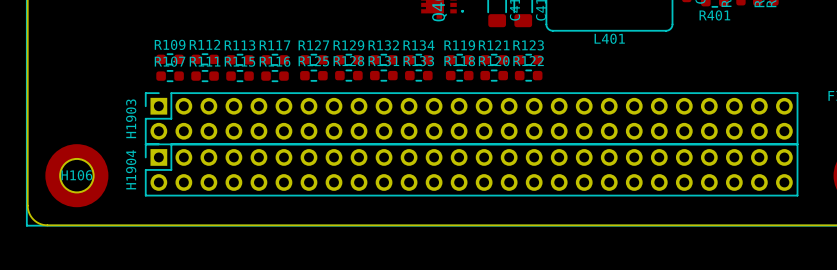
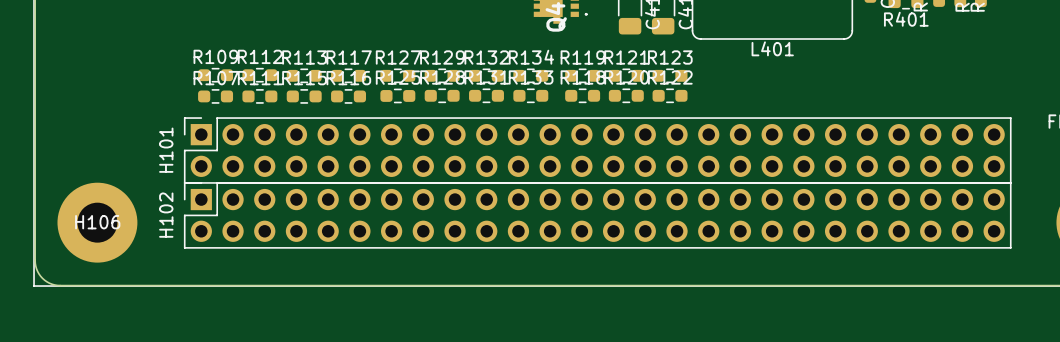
H1903 name: H1903 (131, 118) -> H101 (166, 150)
H1904 name: H1904 (131, 169) -> H102 (166, 215)

